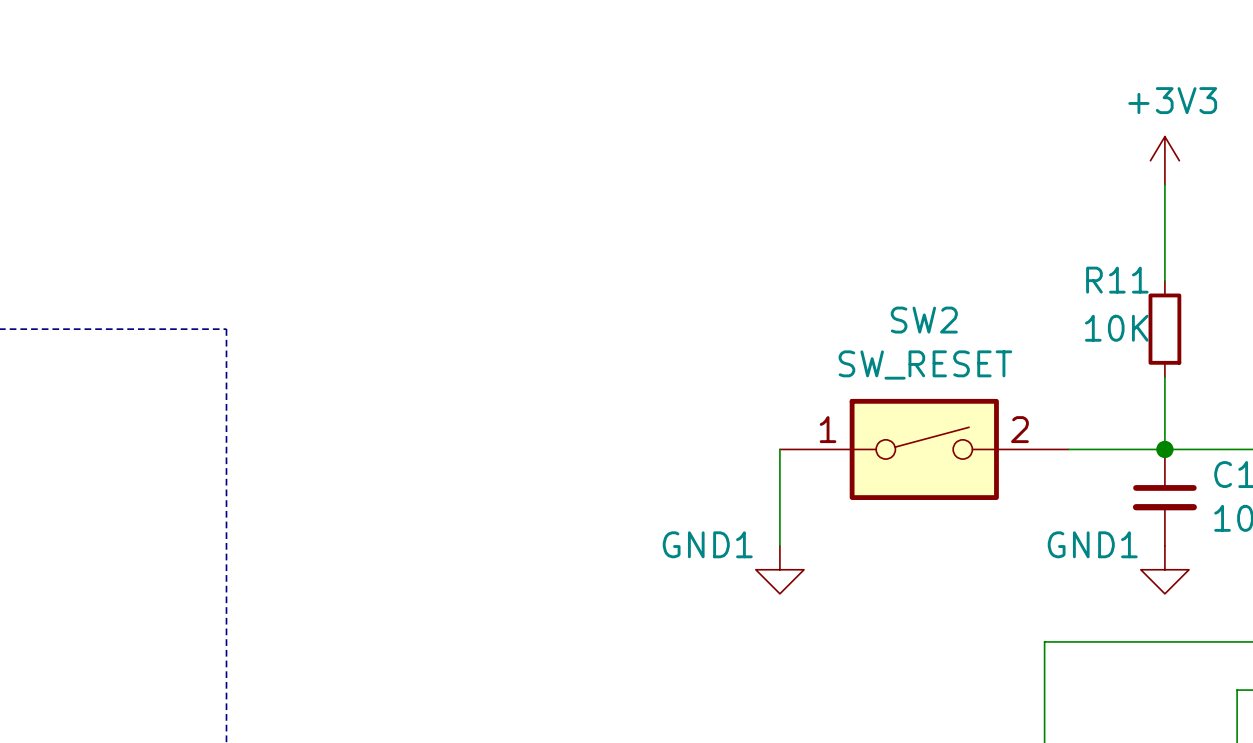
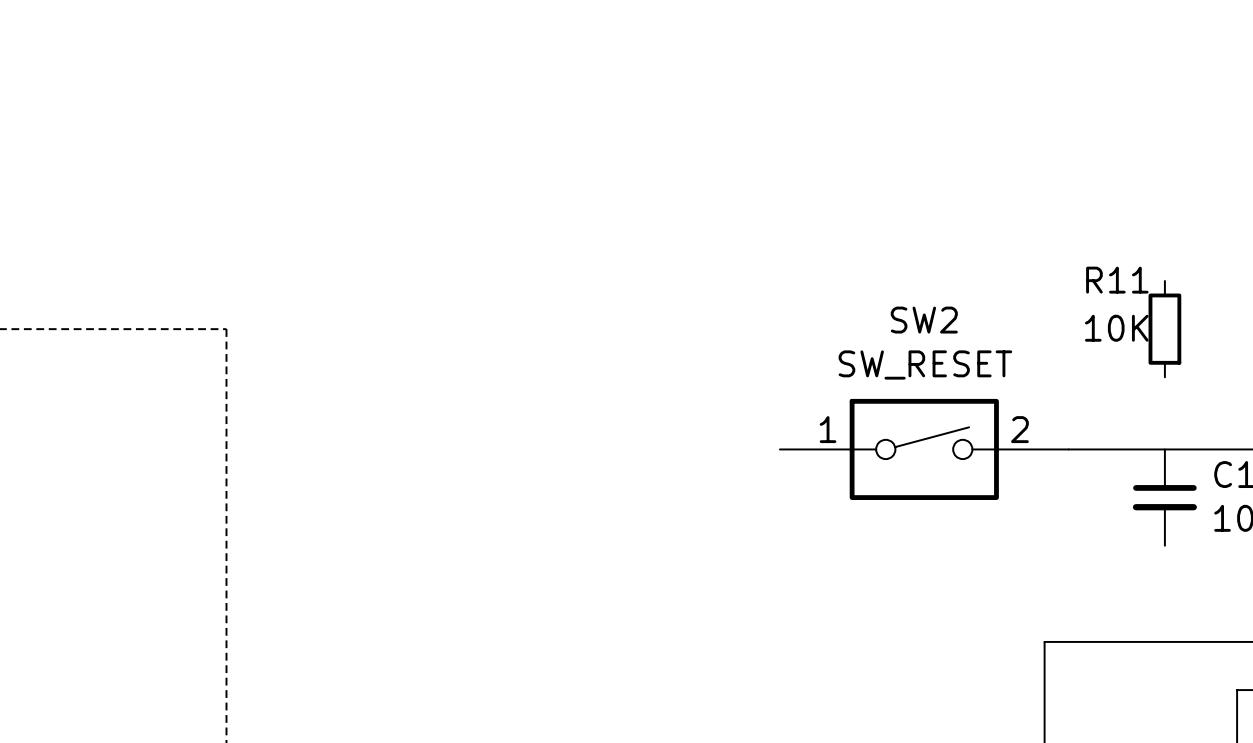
power symbol: +3V3 (1164, 160) -> none
wire: (1164, 184) (1164, 281) -> none
wire: (1164, 377) (1164, 449) -> none
wire: (779, 449) (779, 545) -> none
junction: (1164, 449) -> none
power symbol: GND1 (779, 569) -> none
power symbol: GND1 (1164, 569) -> none

